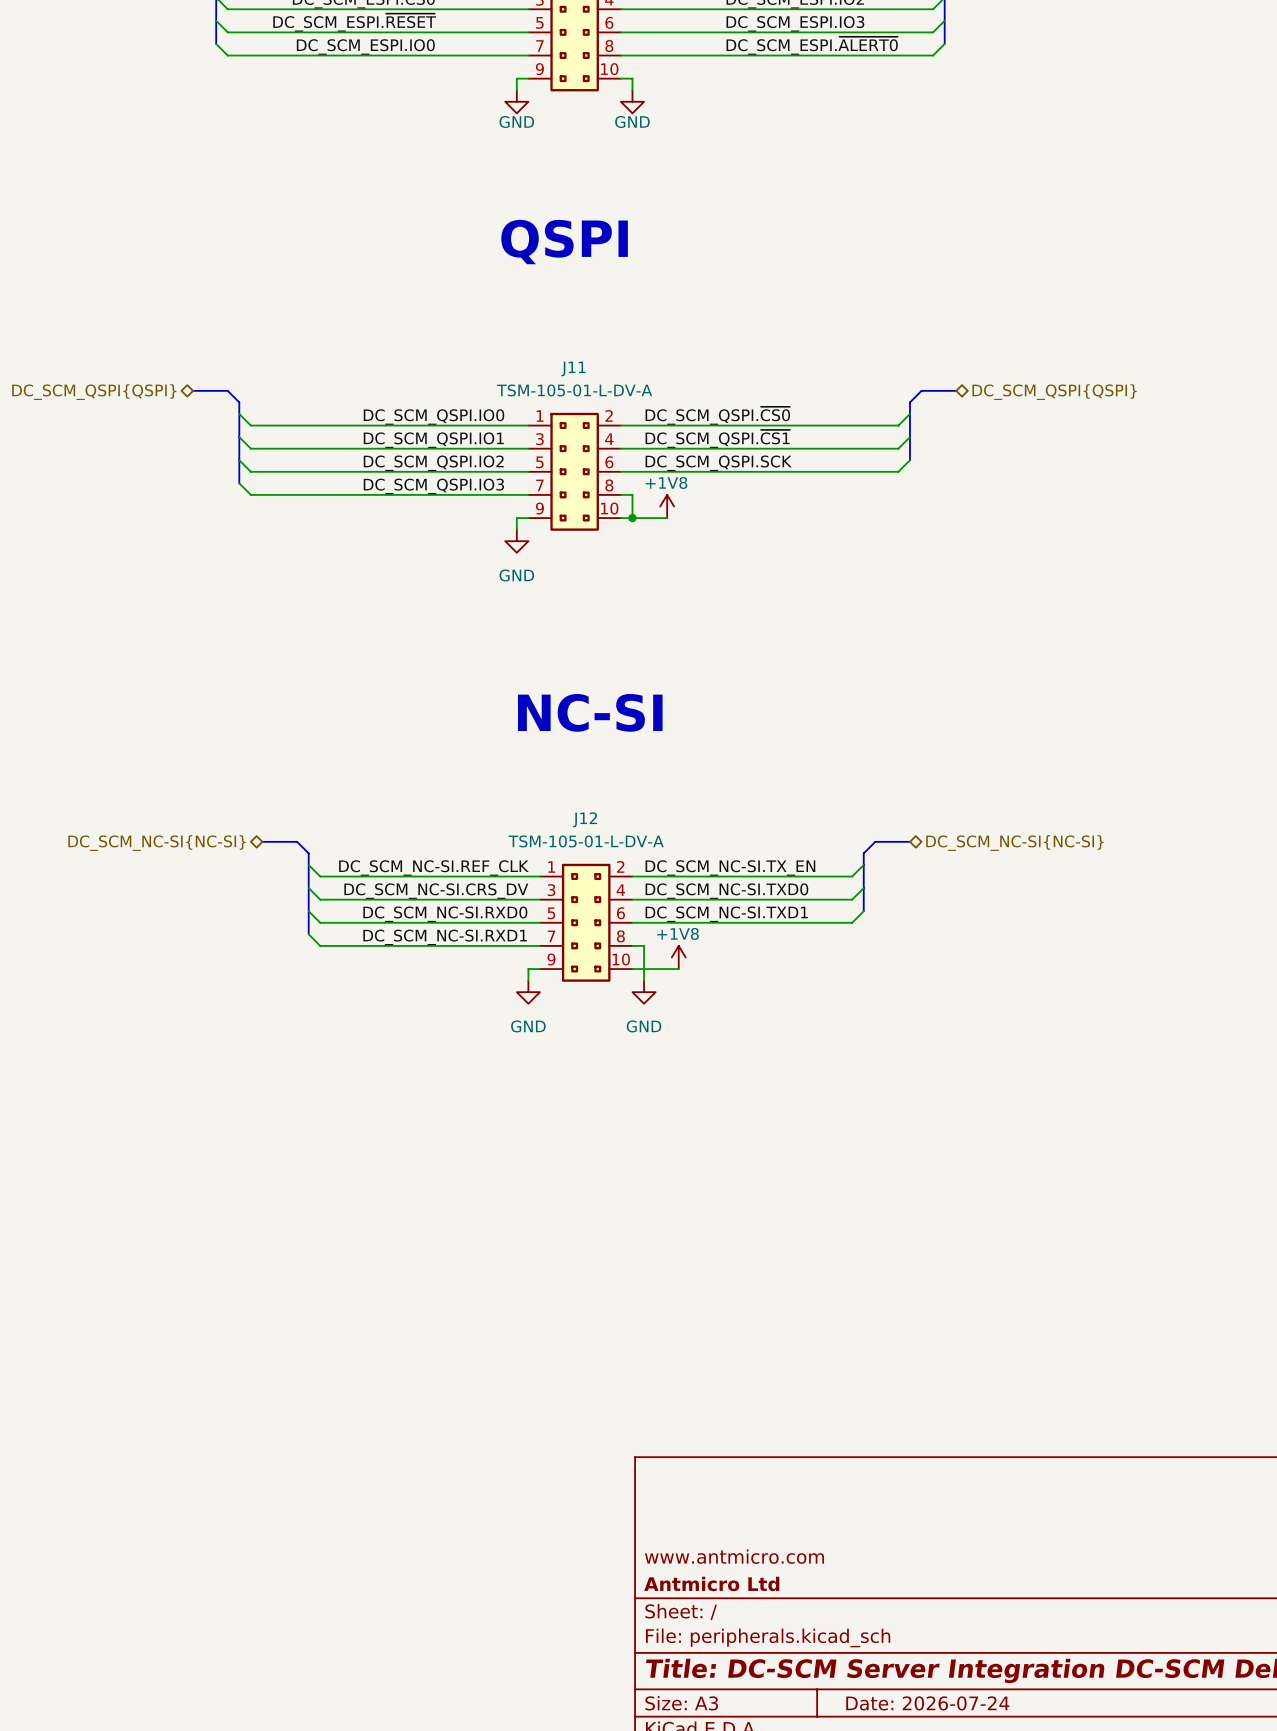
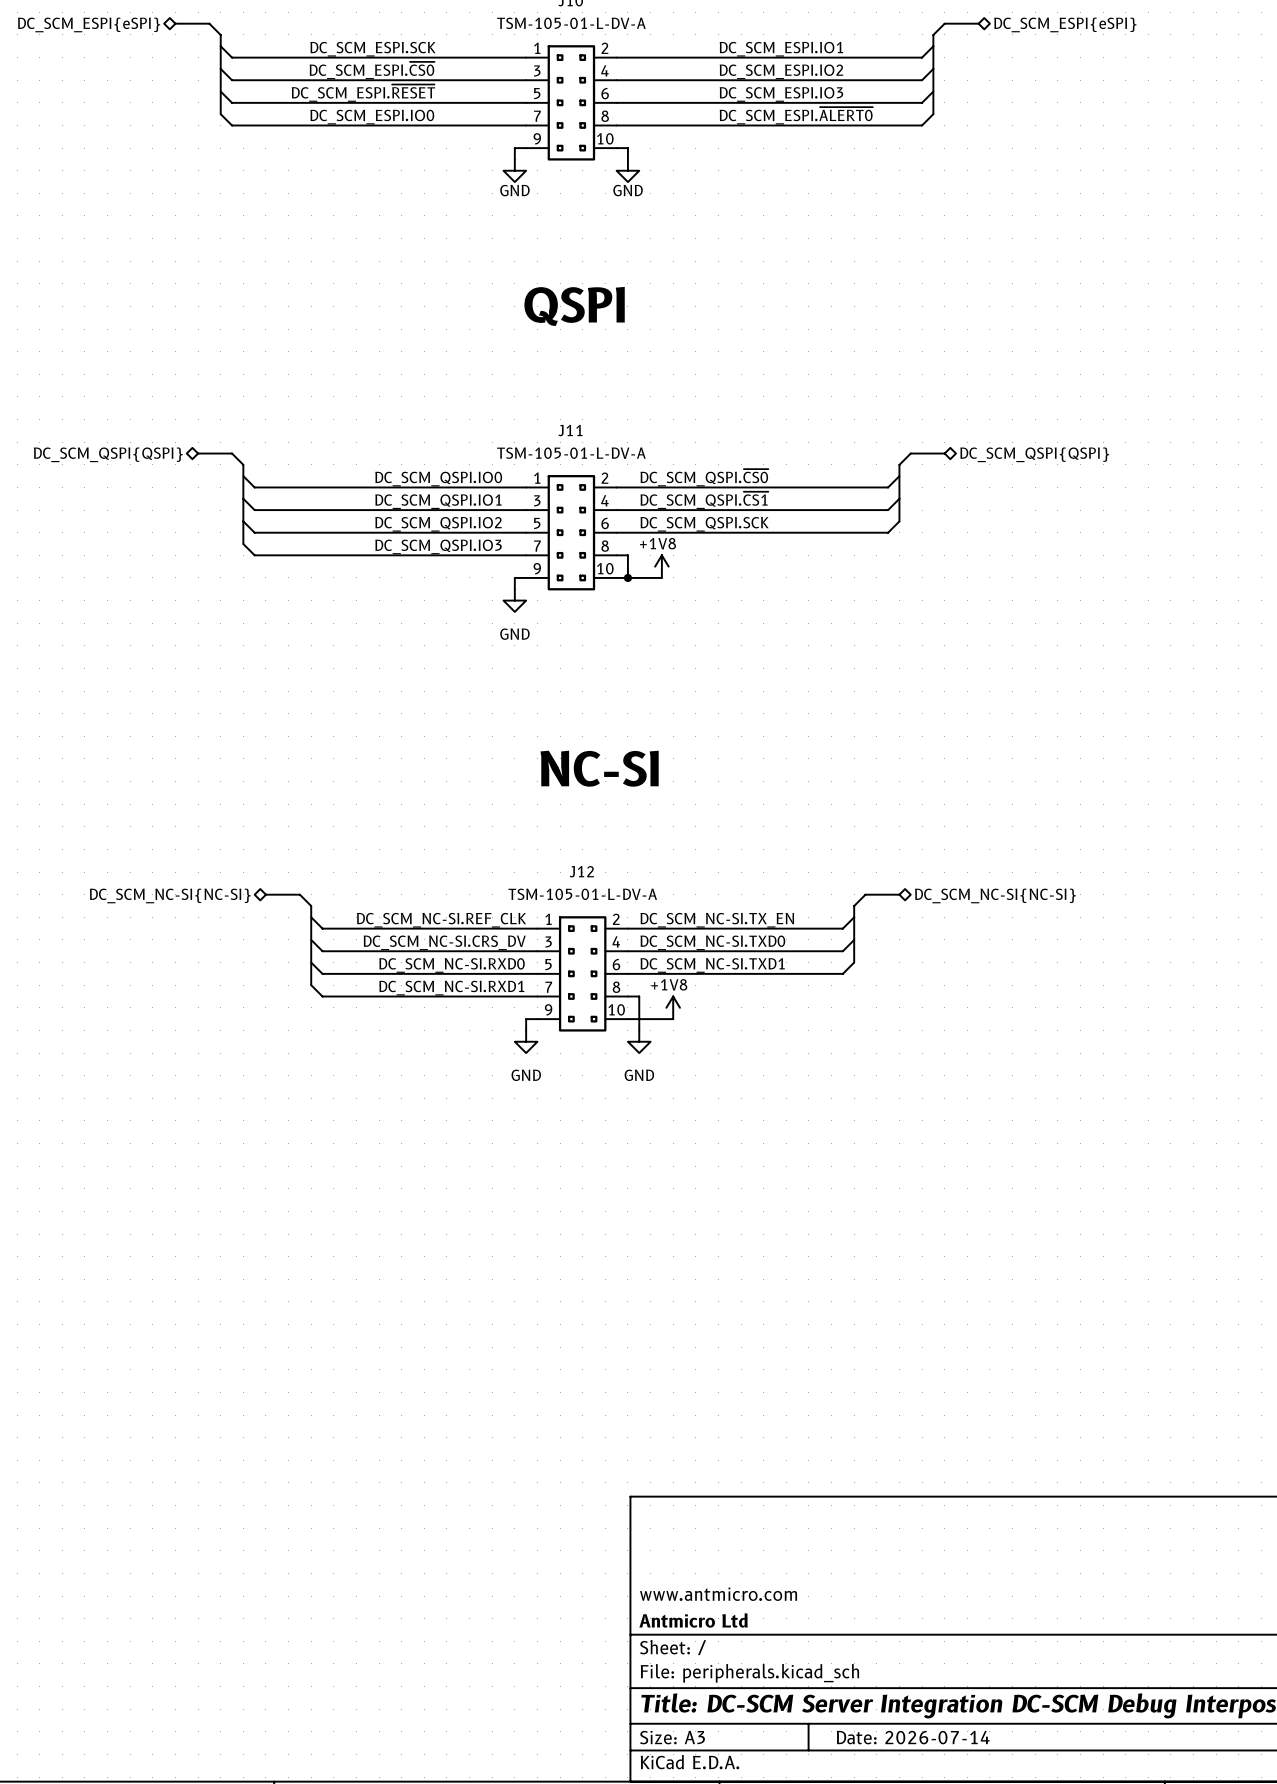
title block: Date: 2026-07-24 (927, 1703) -> Date: 2026-07-14 (913, 1737)

